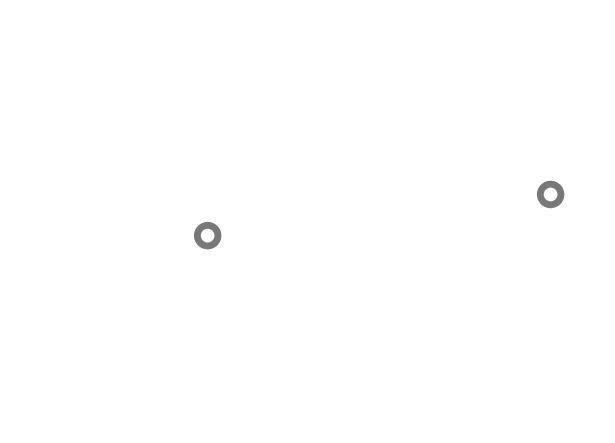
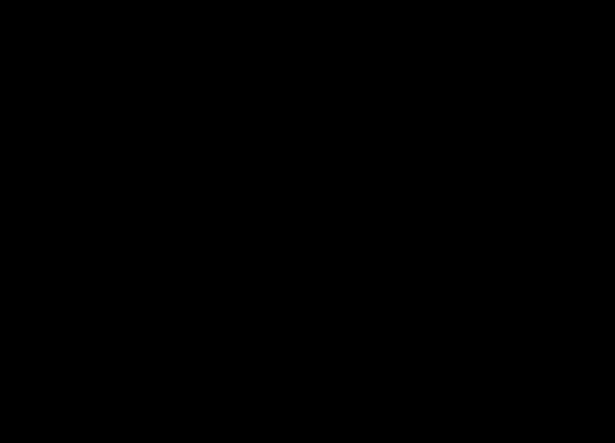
via: (550, 194) -> none
via: (207, 235) -> none

